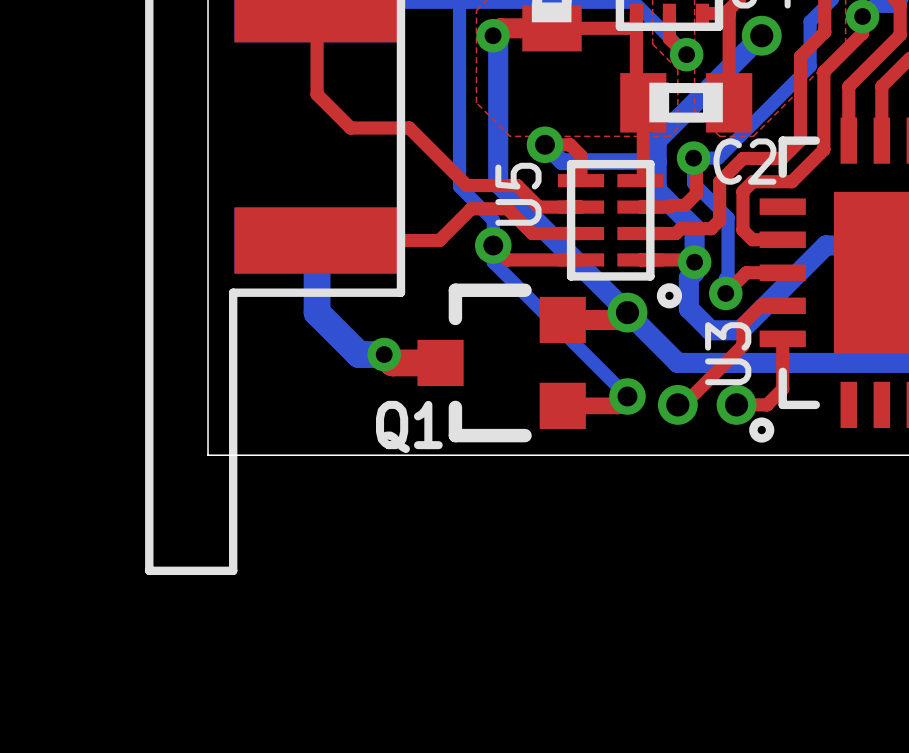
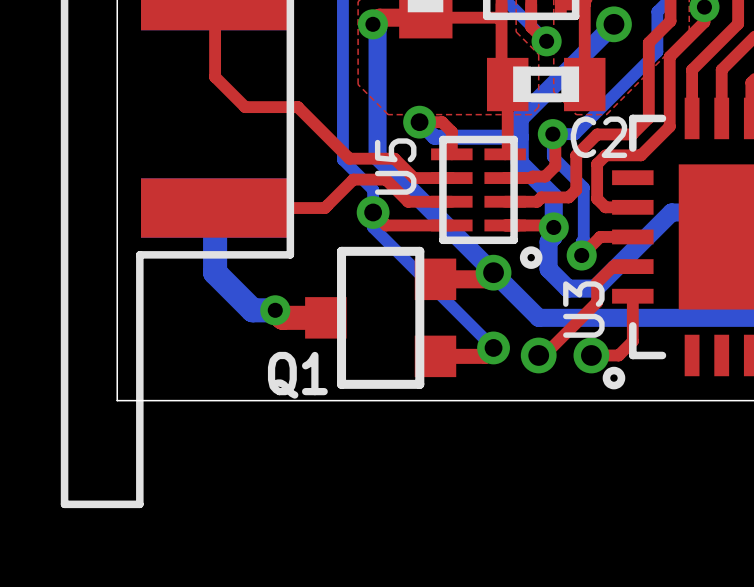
Q1 footprint: [417, 283, 586, 443] -> [305, 246, 457, 389]

